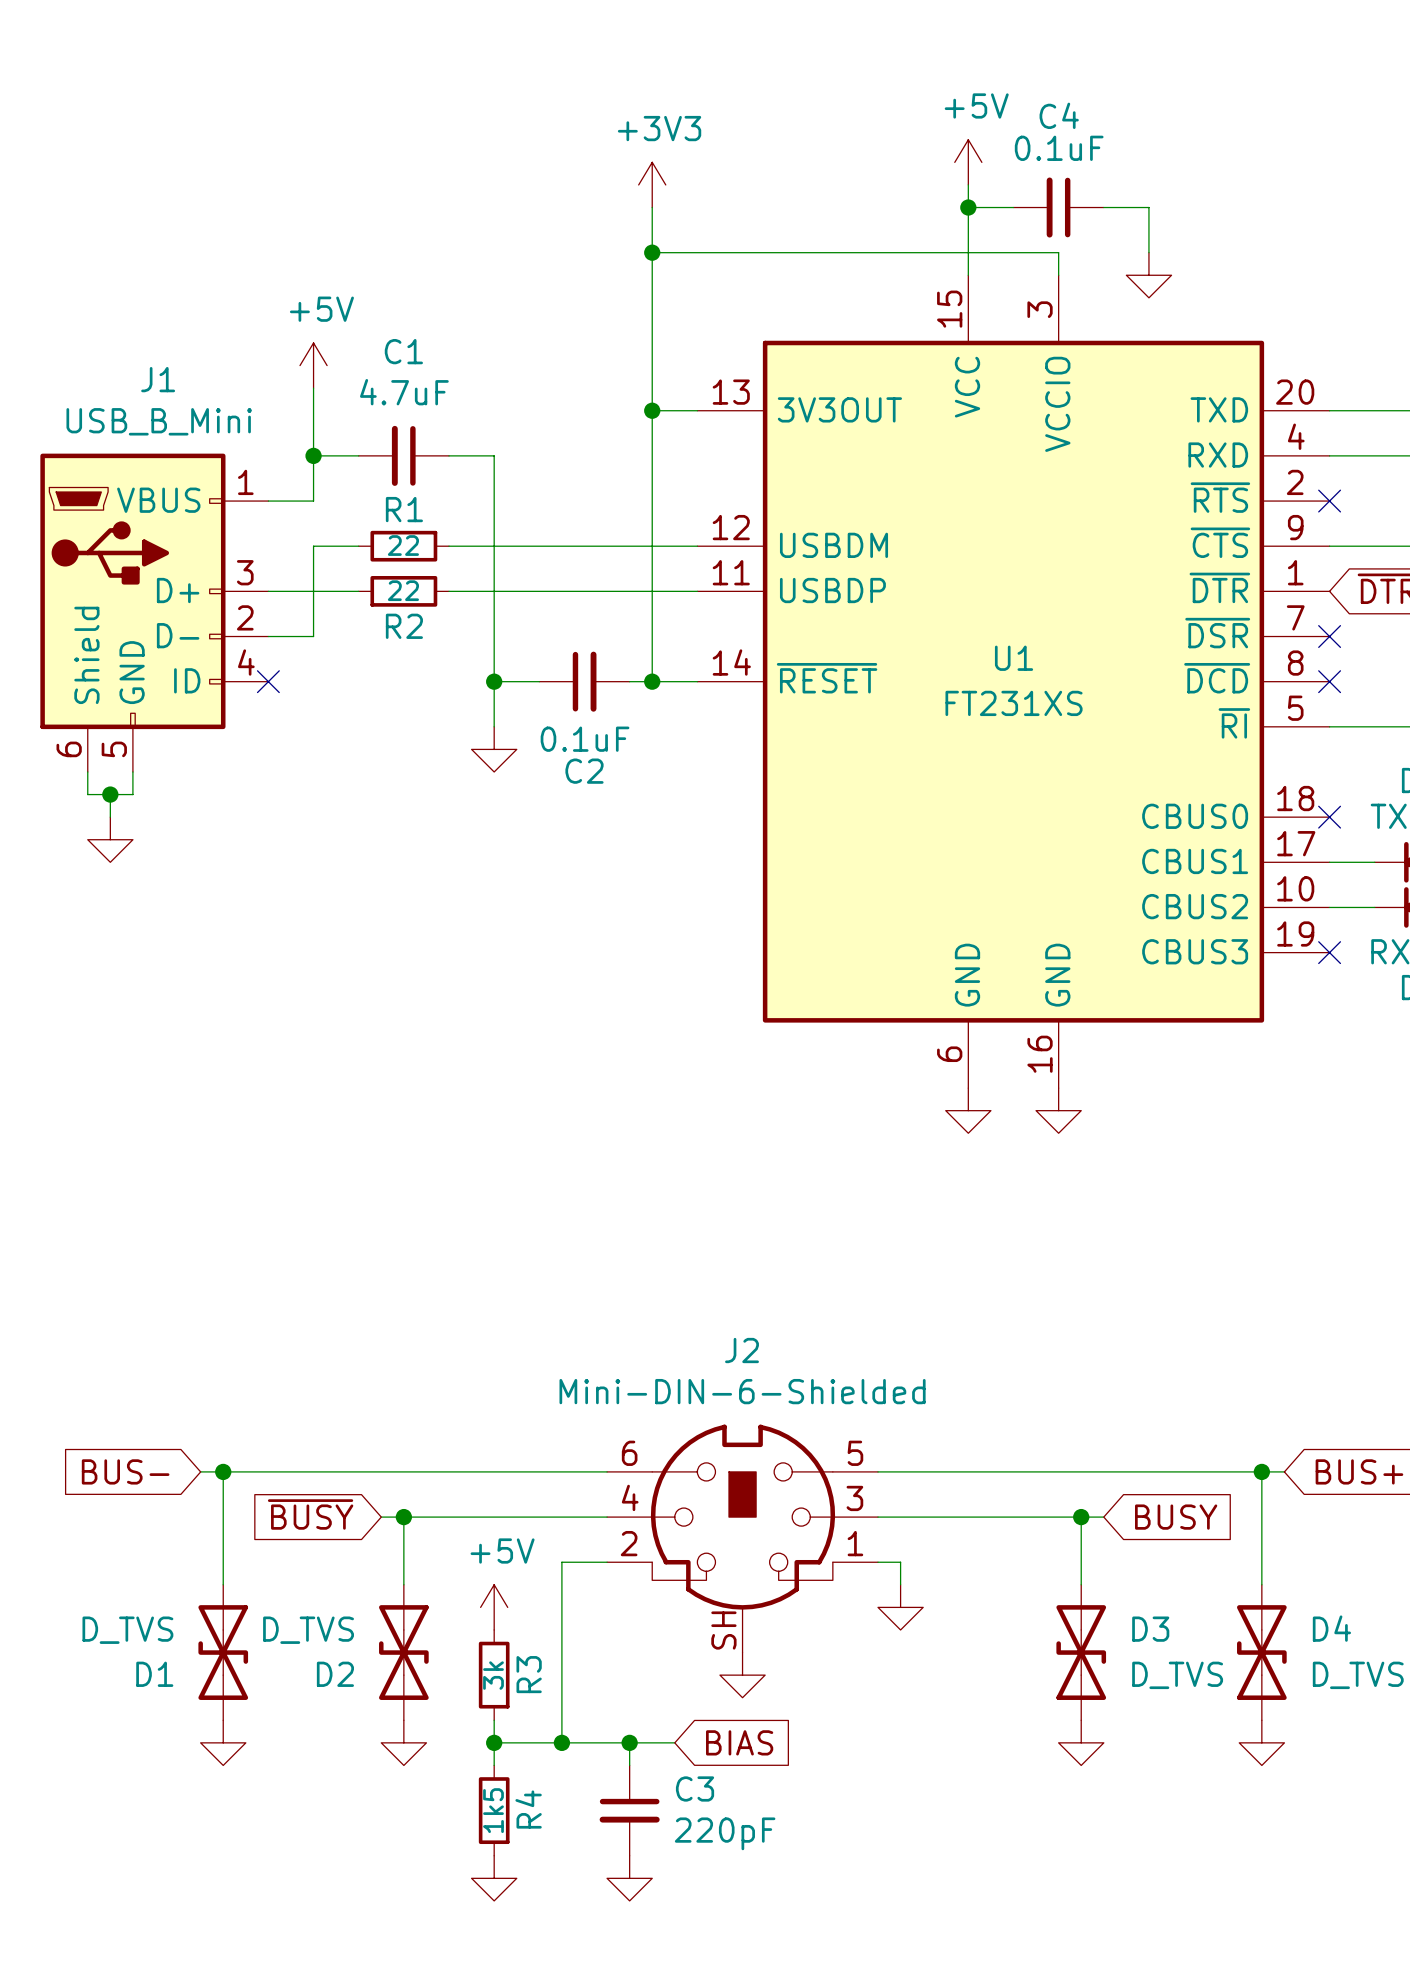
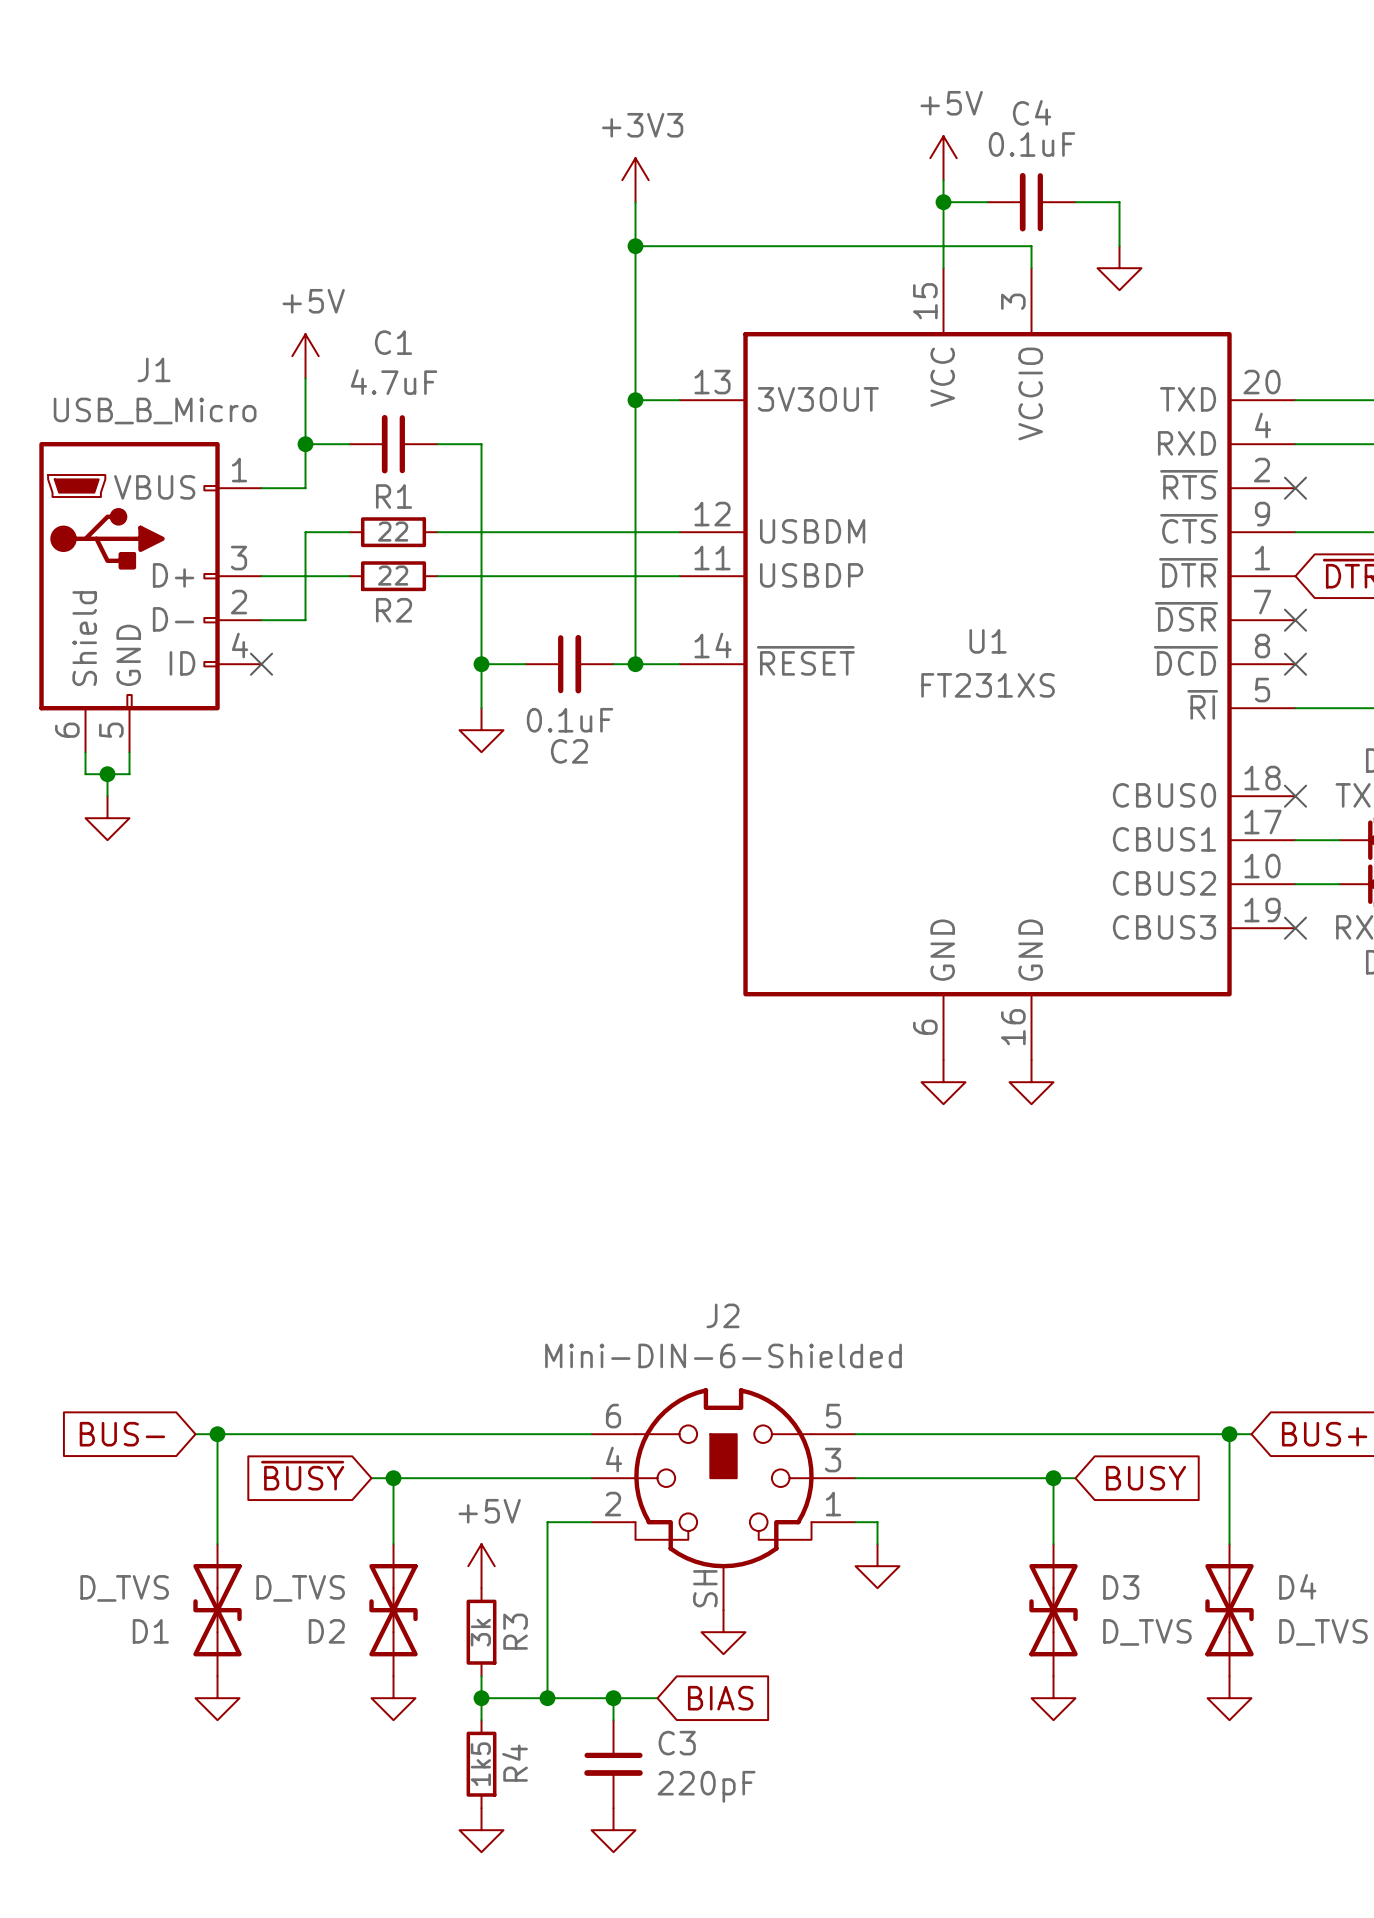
J1 value: USB_B_Mini (159, 421) -> USB_B_Micro (155, 410)

